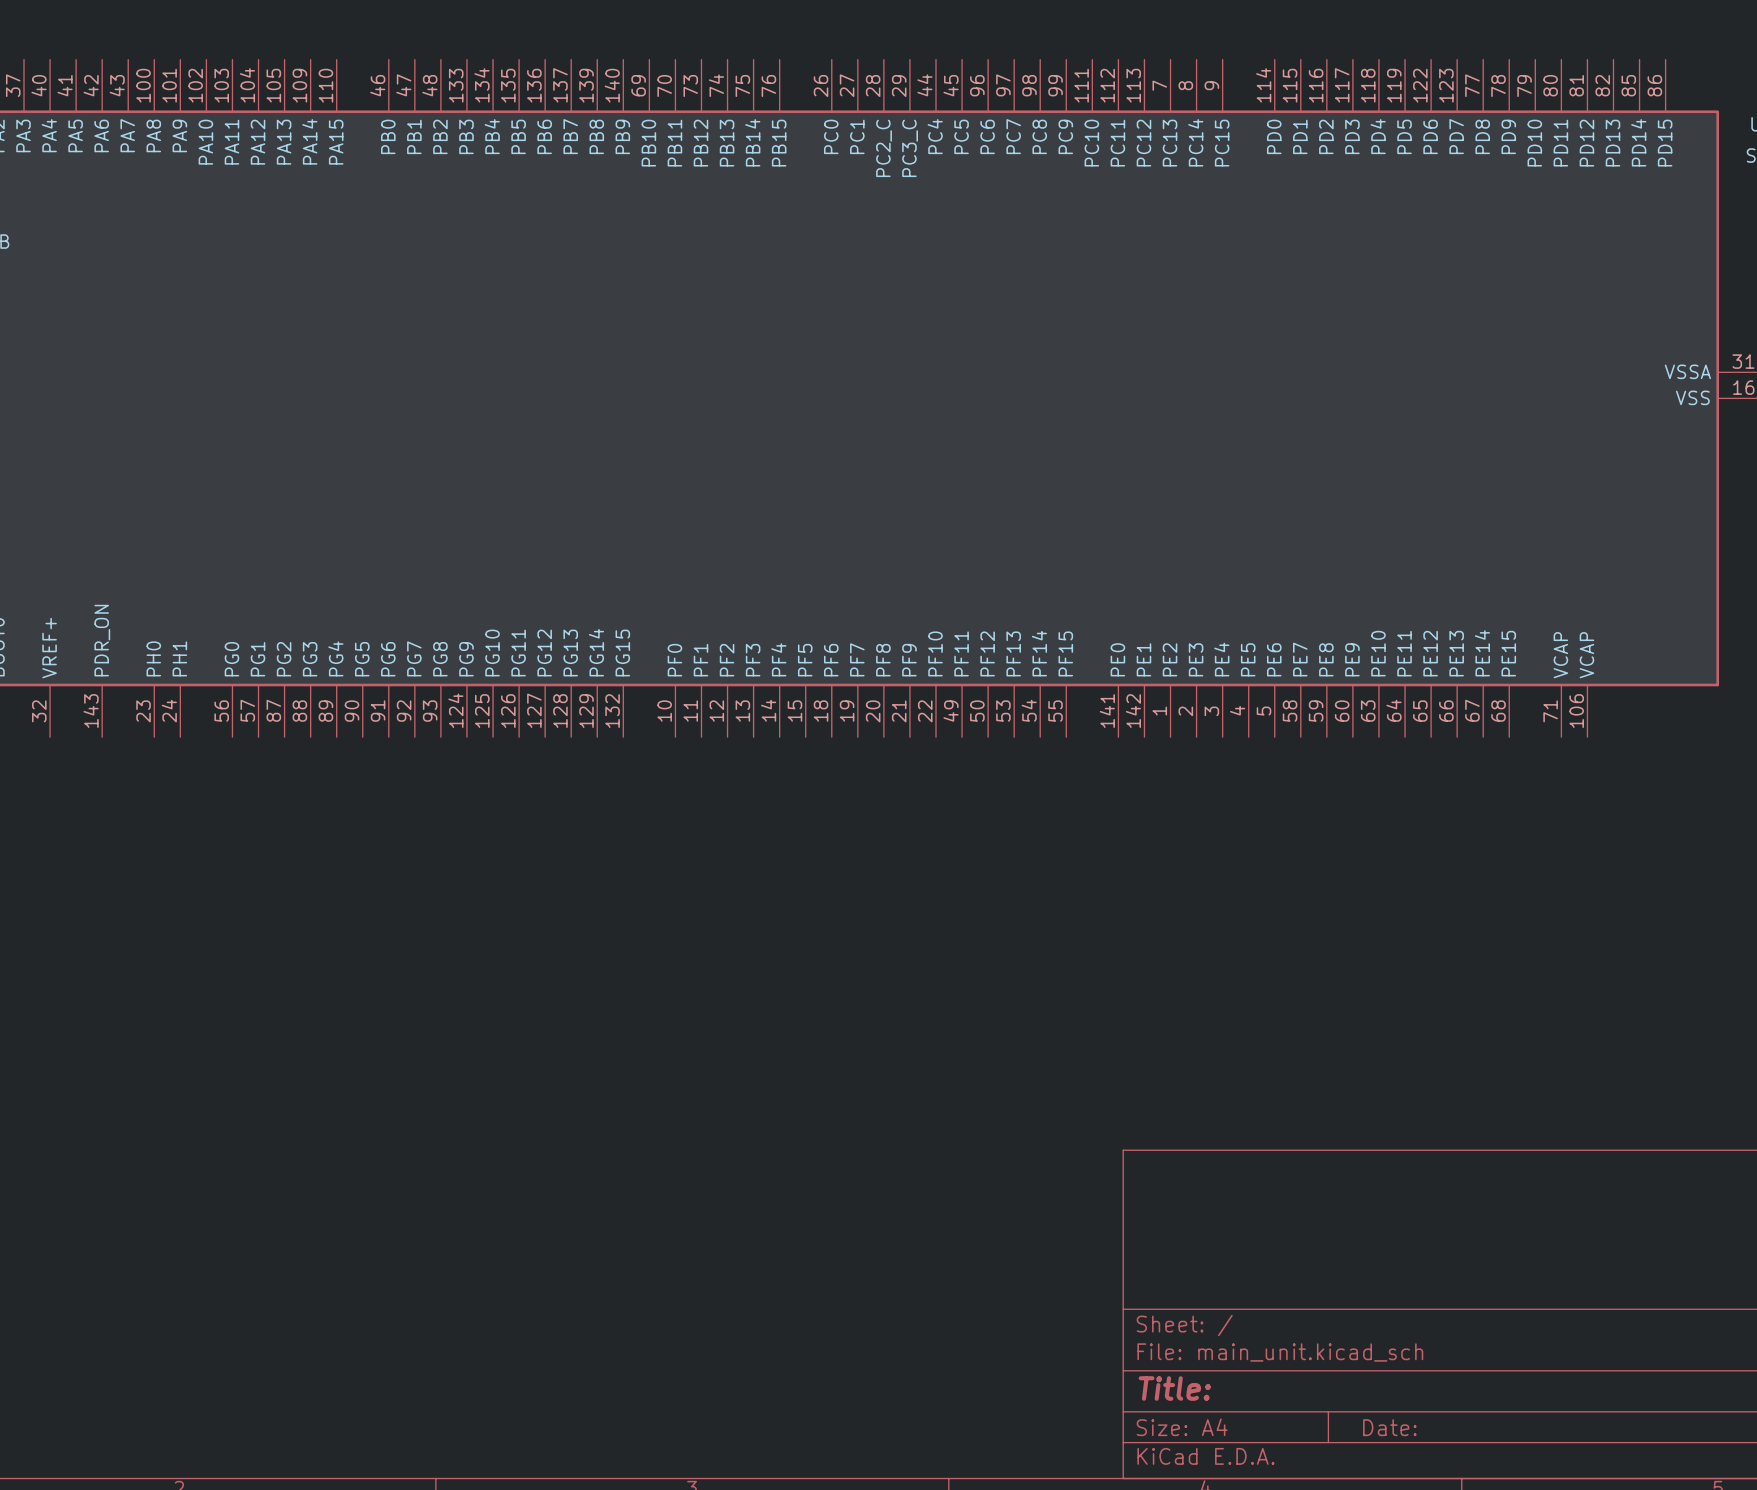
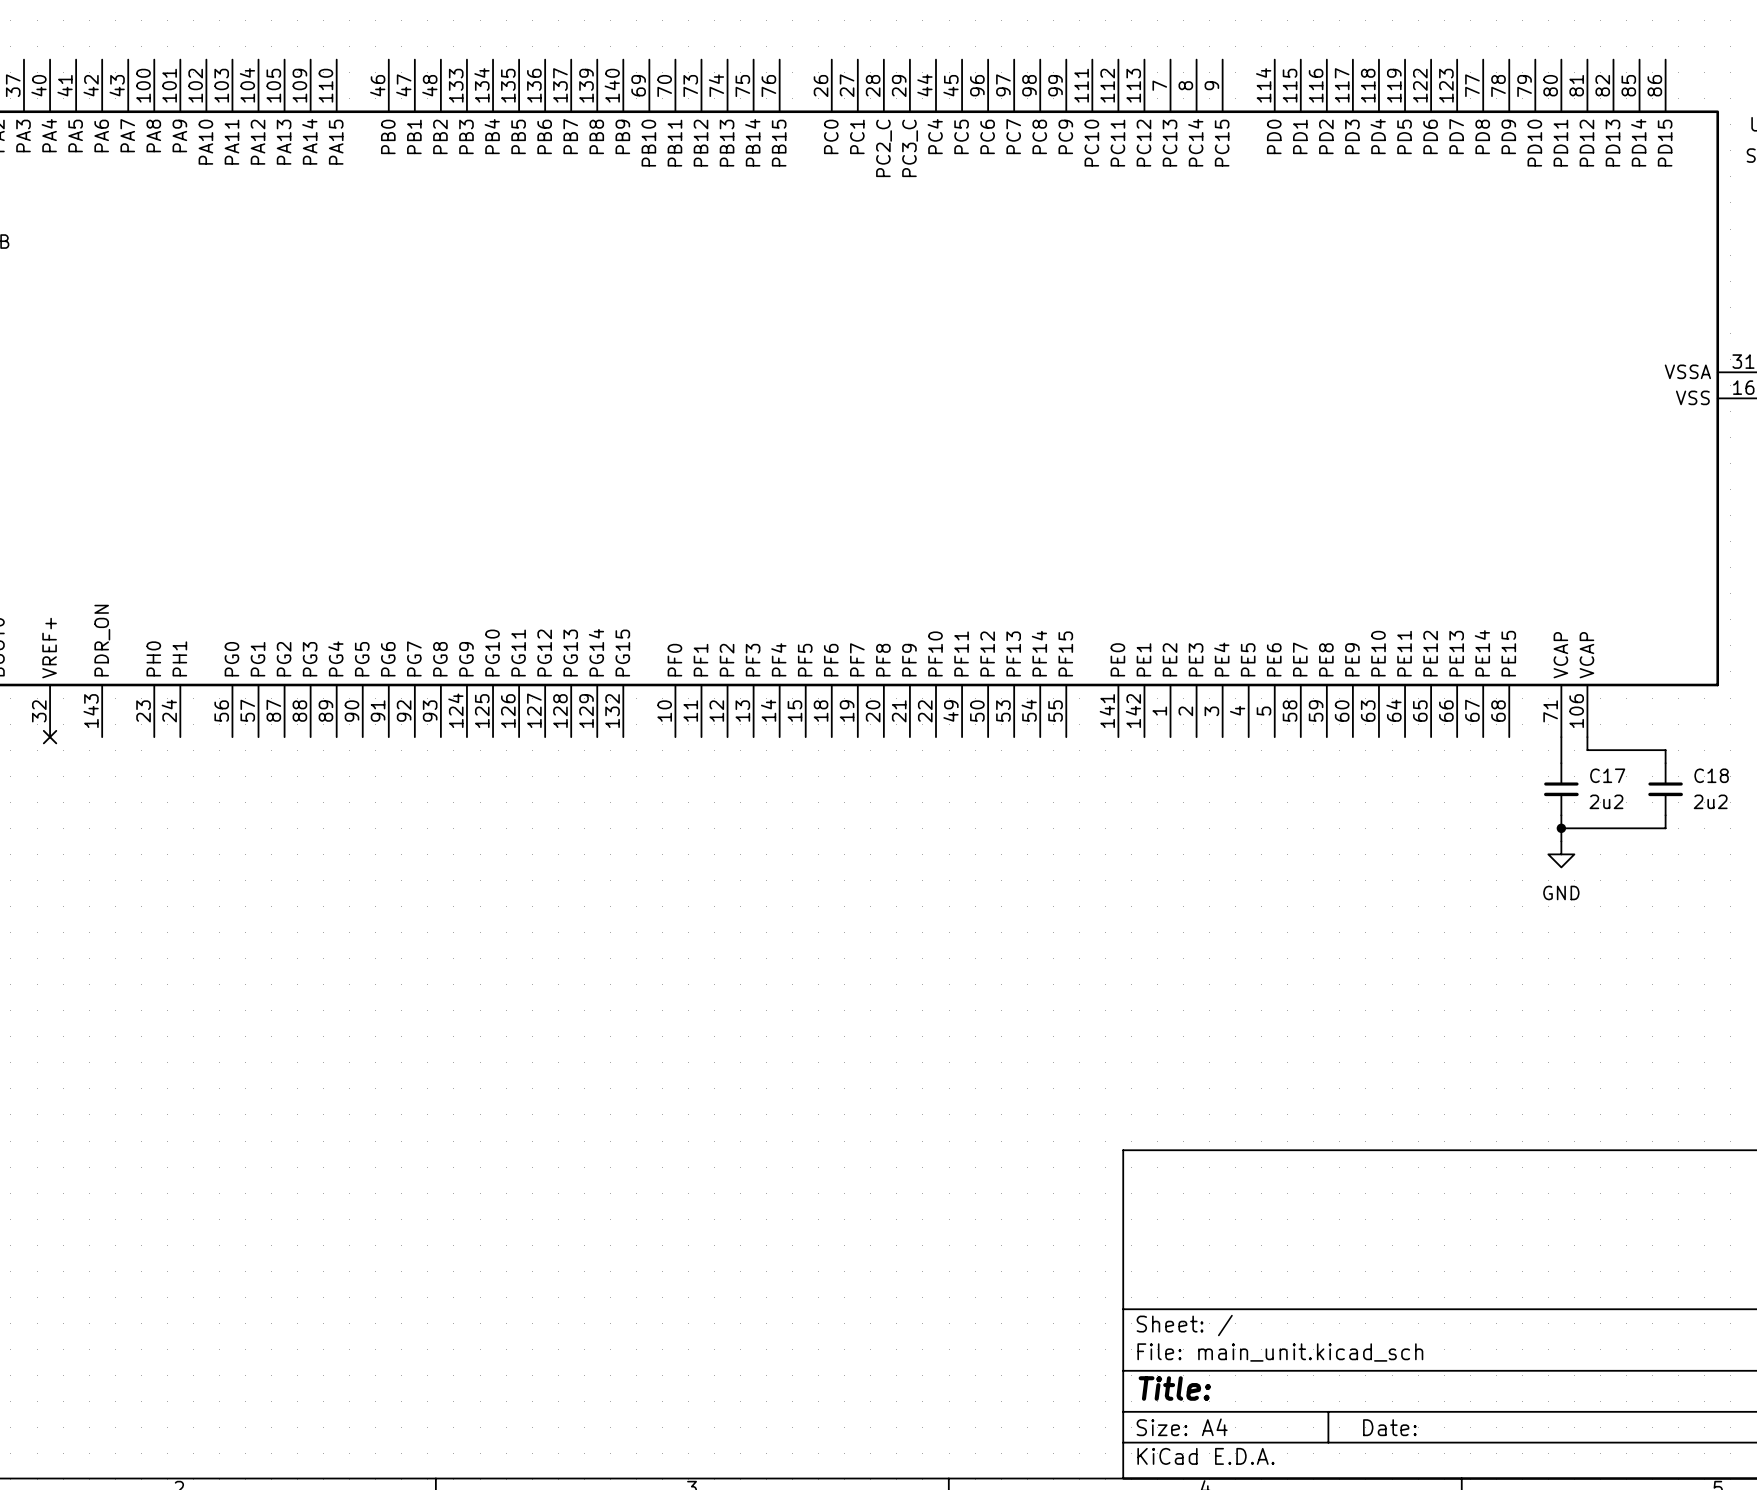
no-connect mark: none -> (50, 737)
wire: none -> (1561, 737) (1561, 763)
wire: none -> (1587, 737) (1587, 750) (1665, 750) (1665, 763)
C17: none -> 2u2 (1561, 789)
C18: none -> 2u2 (1665, 789)
wire: none -> (1561, 815) (1561, 841)
wire: none -> (1665, 815) (1665, 828) (1561, 828)
junction: none -> (1561, 828)
power symbol: none -> GND (1561, 854)

